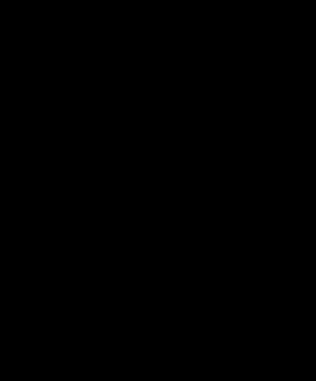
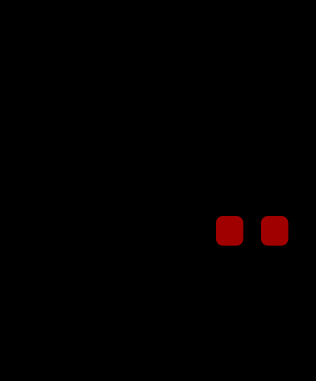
part: none -> (252, 230)

